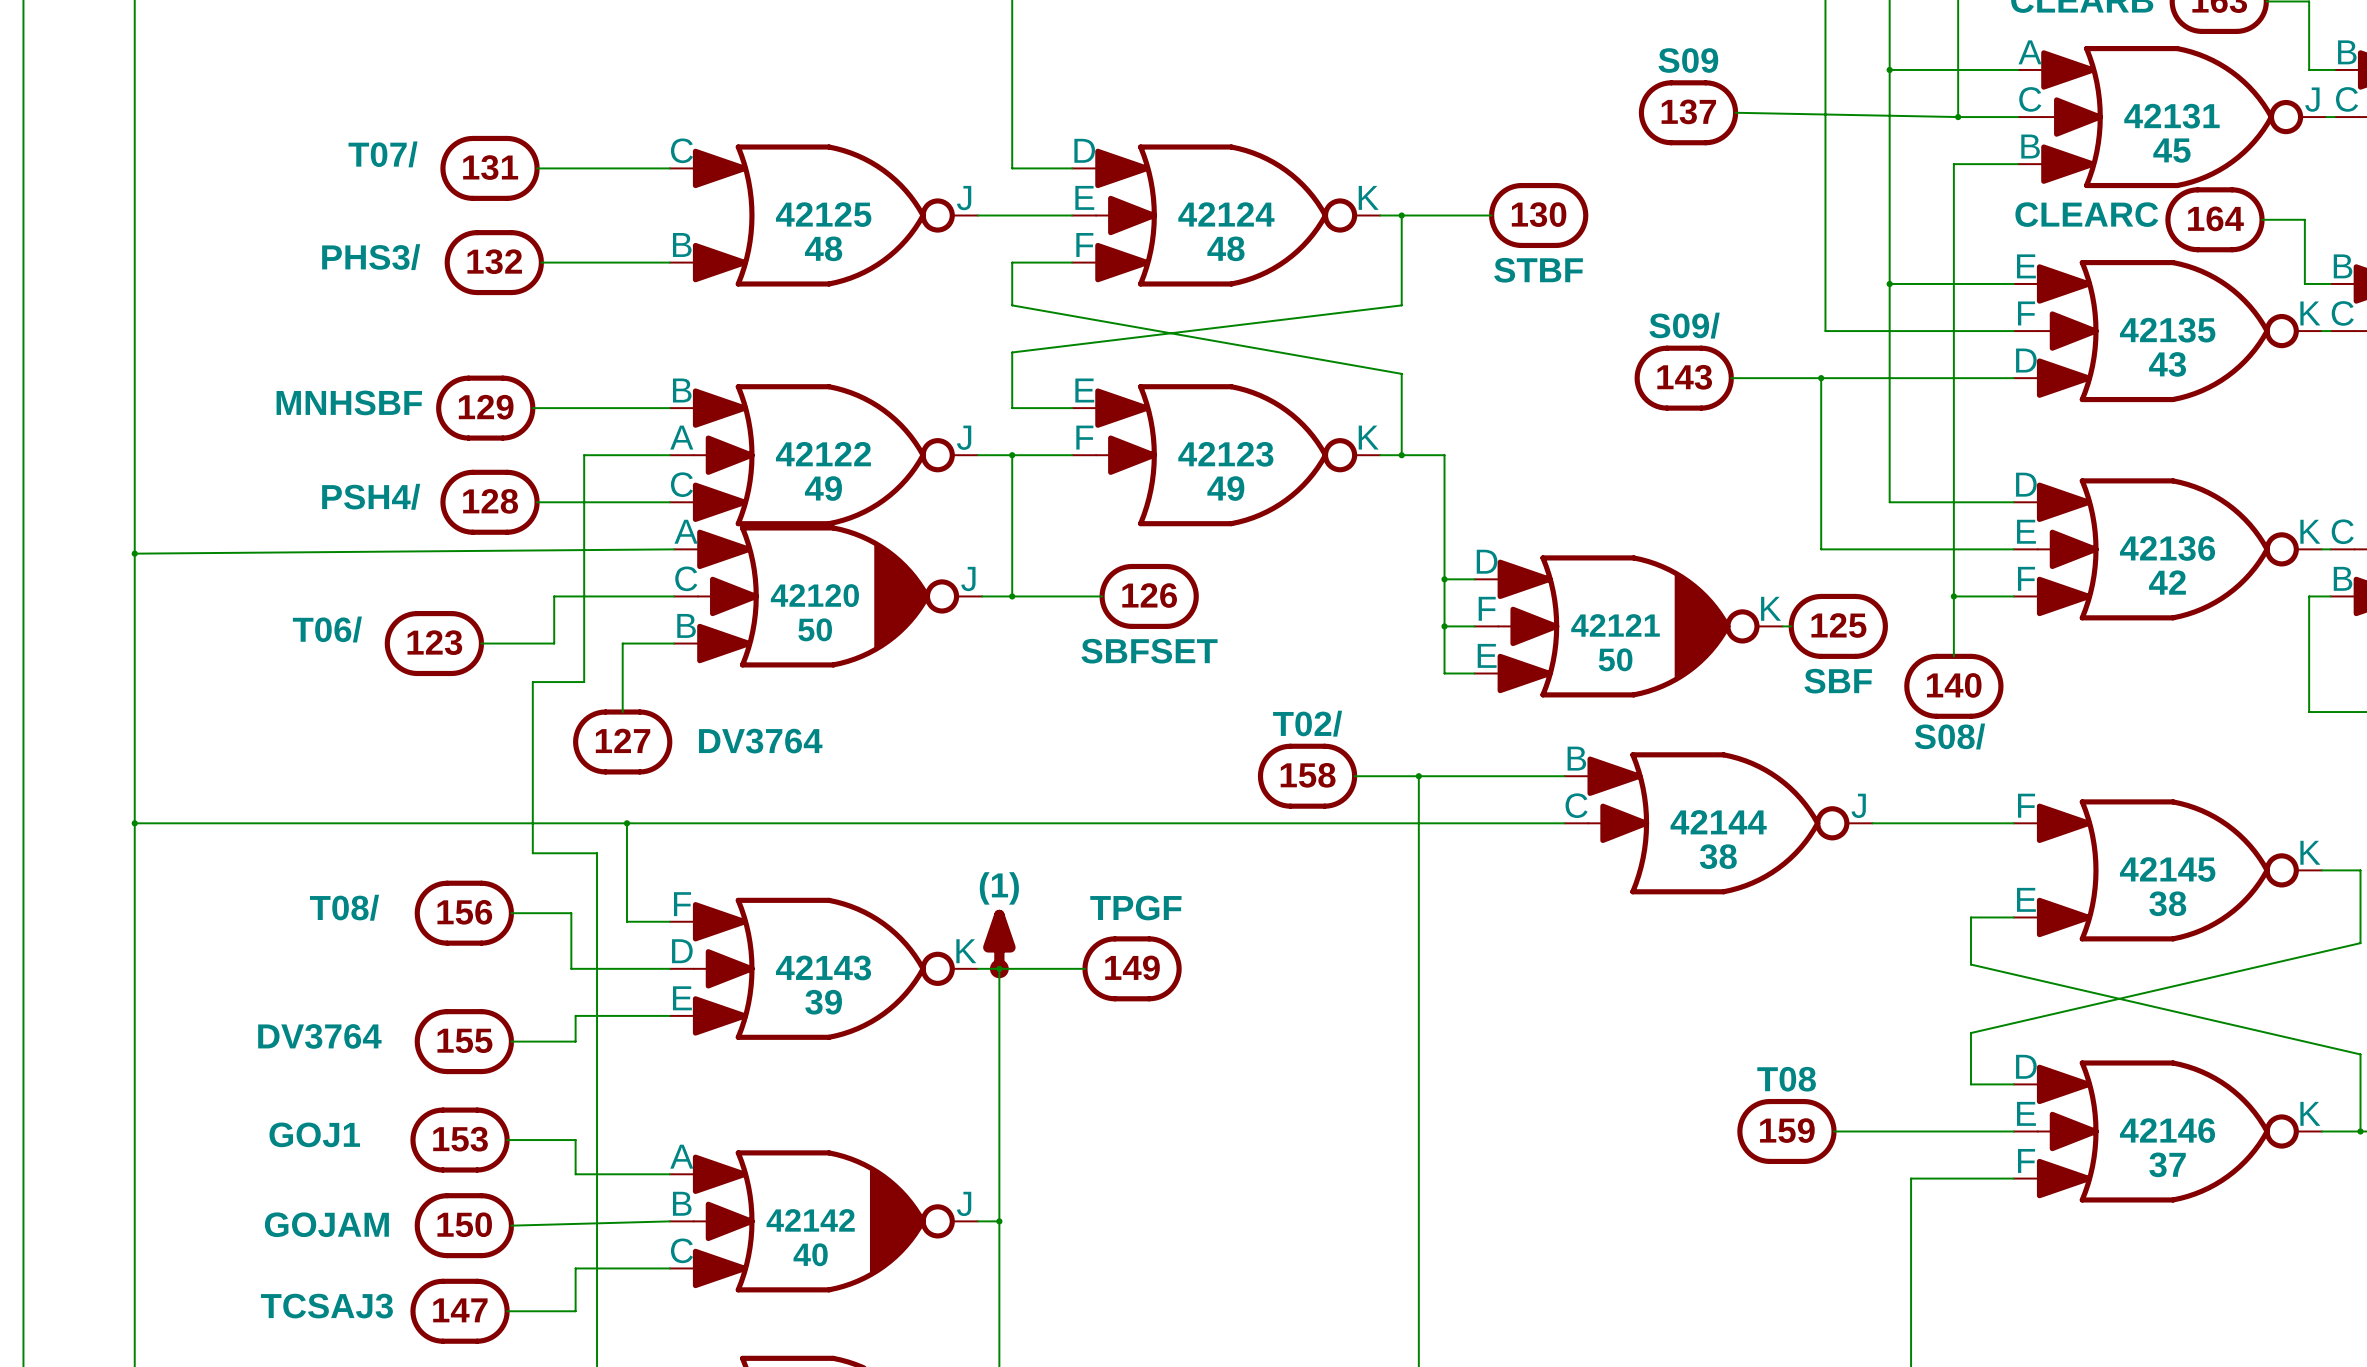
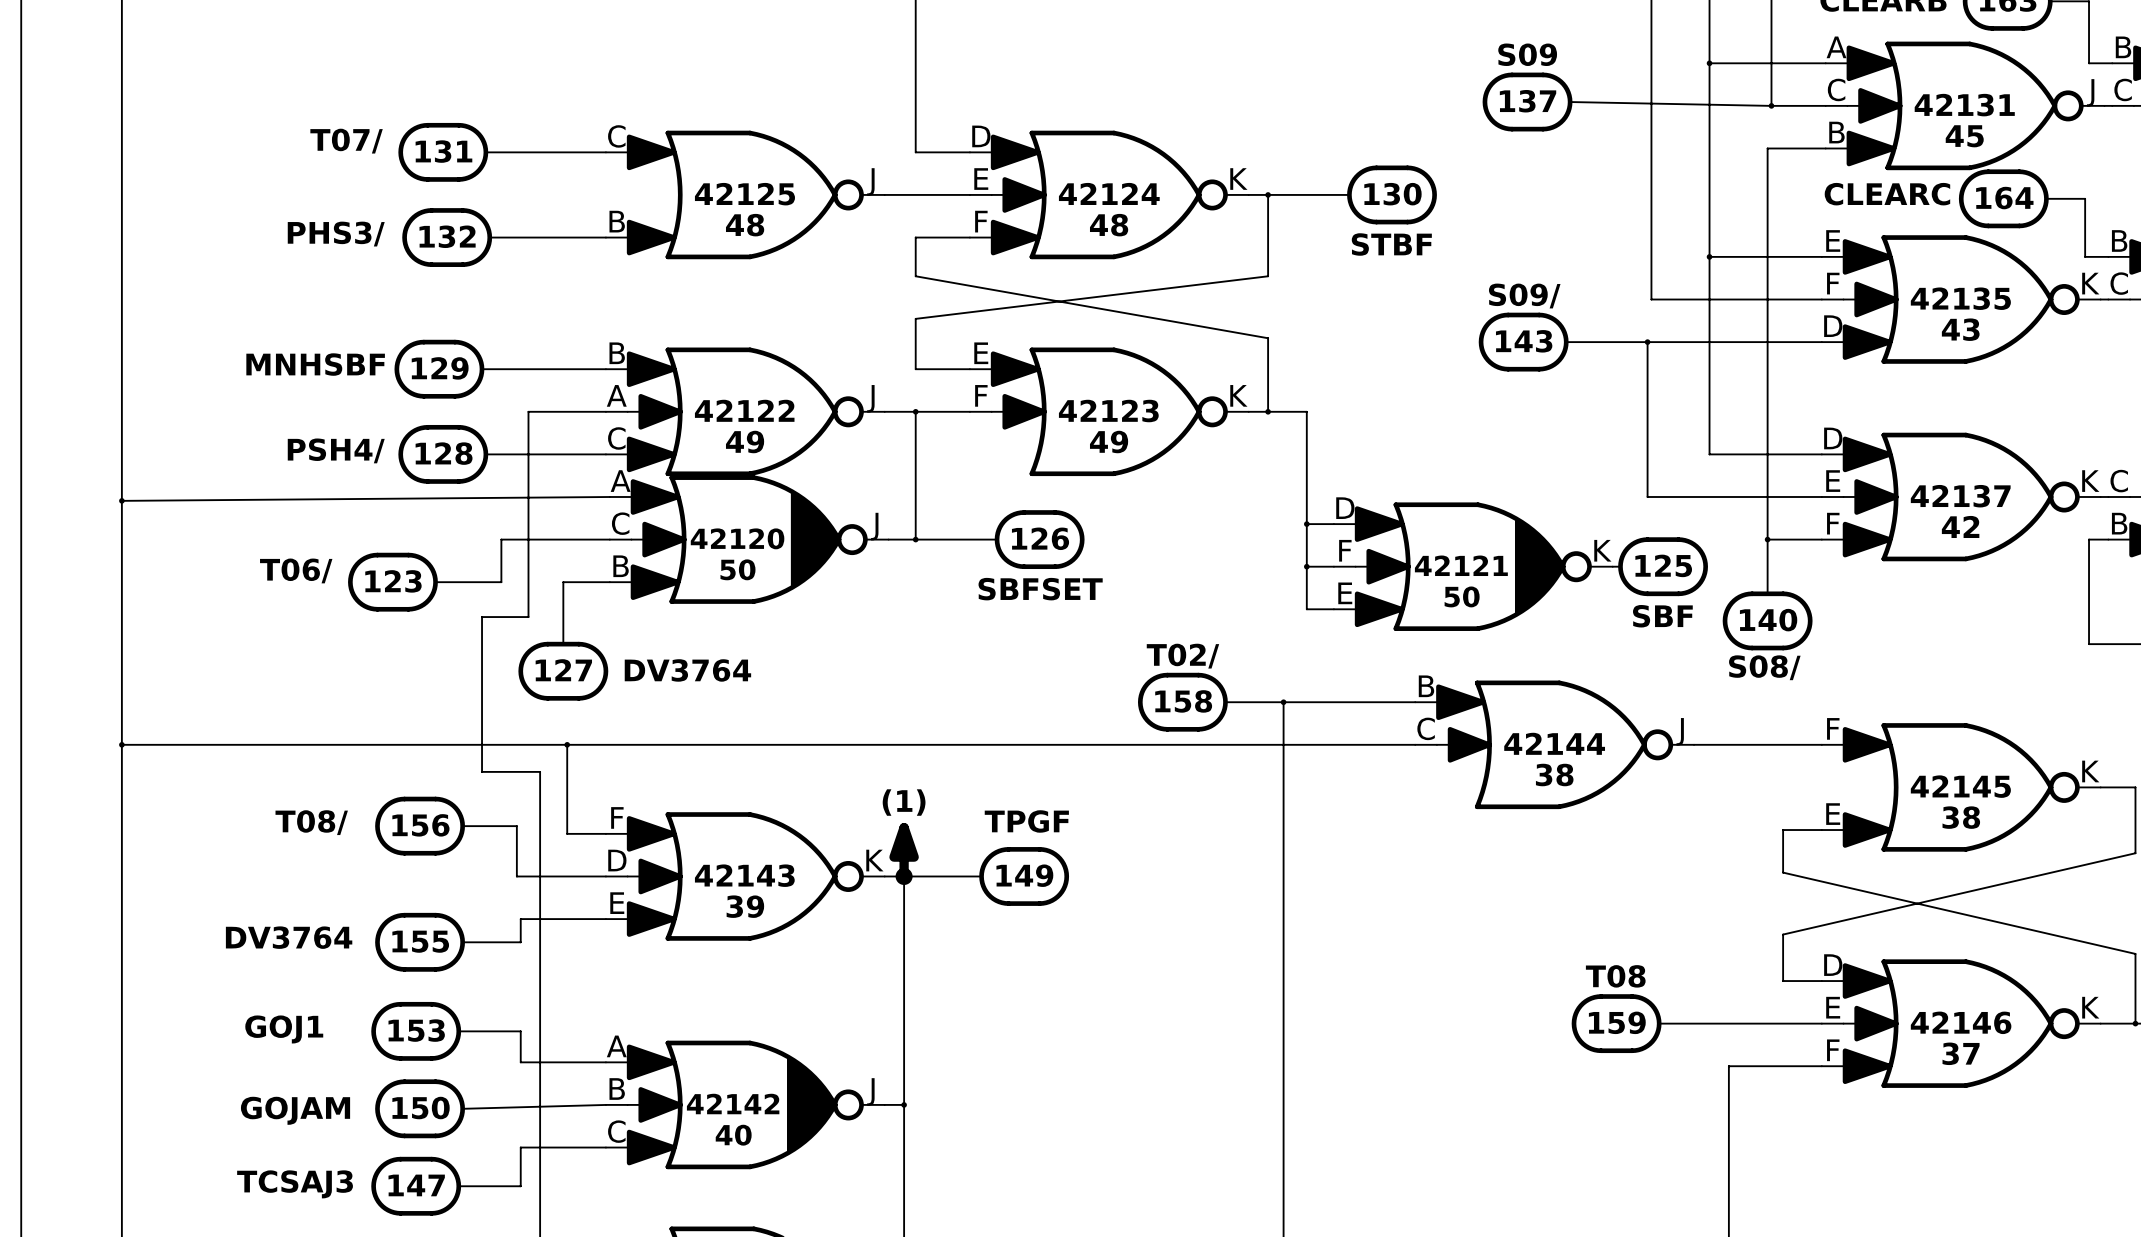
part text: 42136 (2167, 548) -> 42137 (1960, 496)

